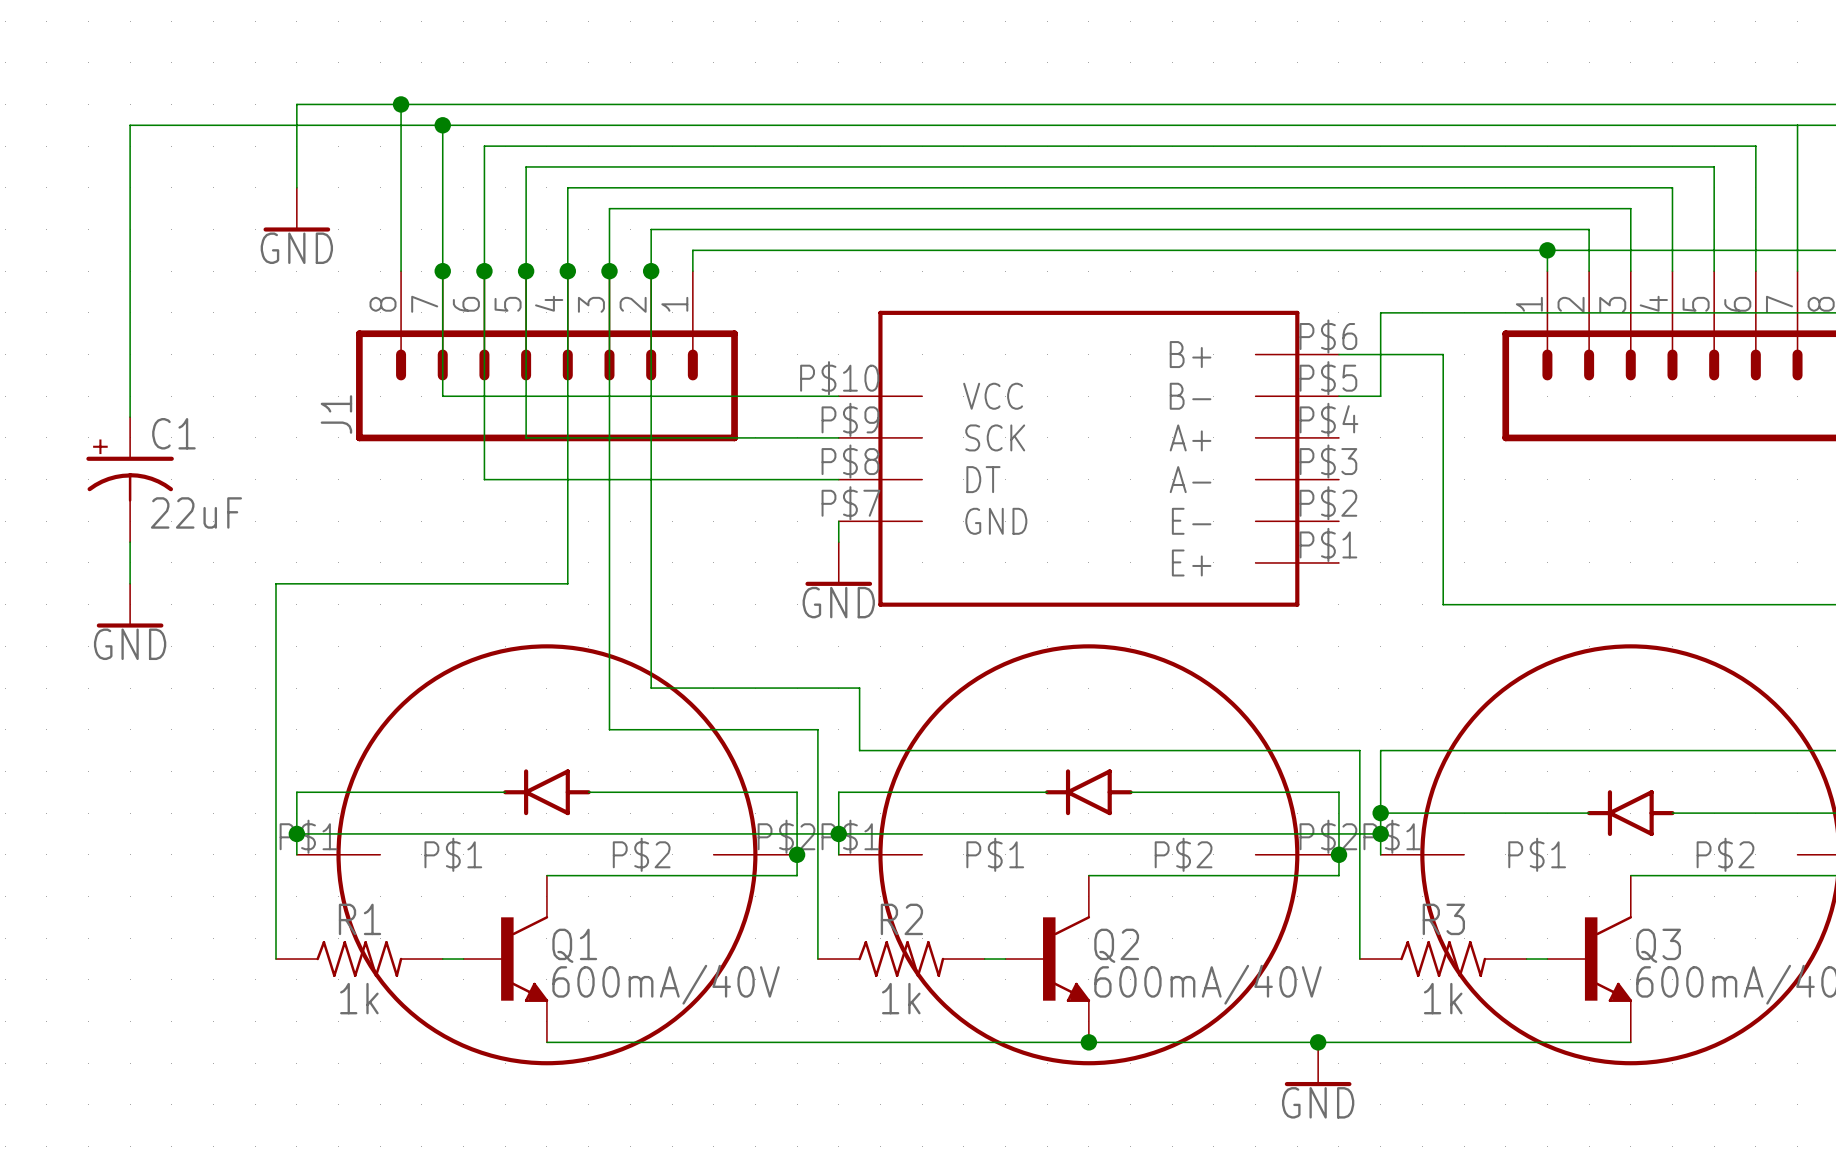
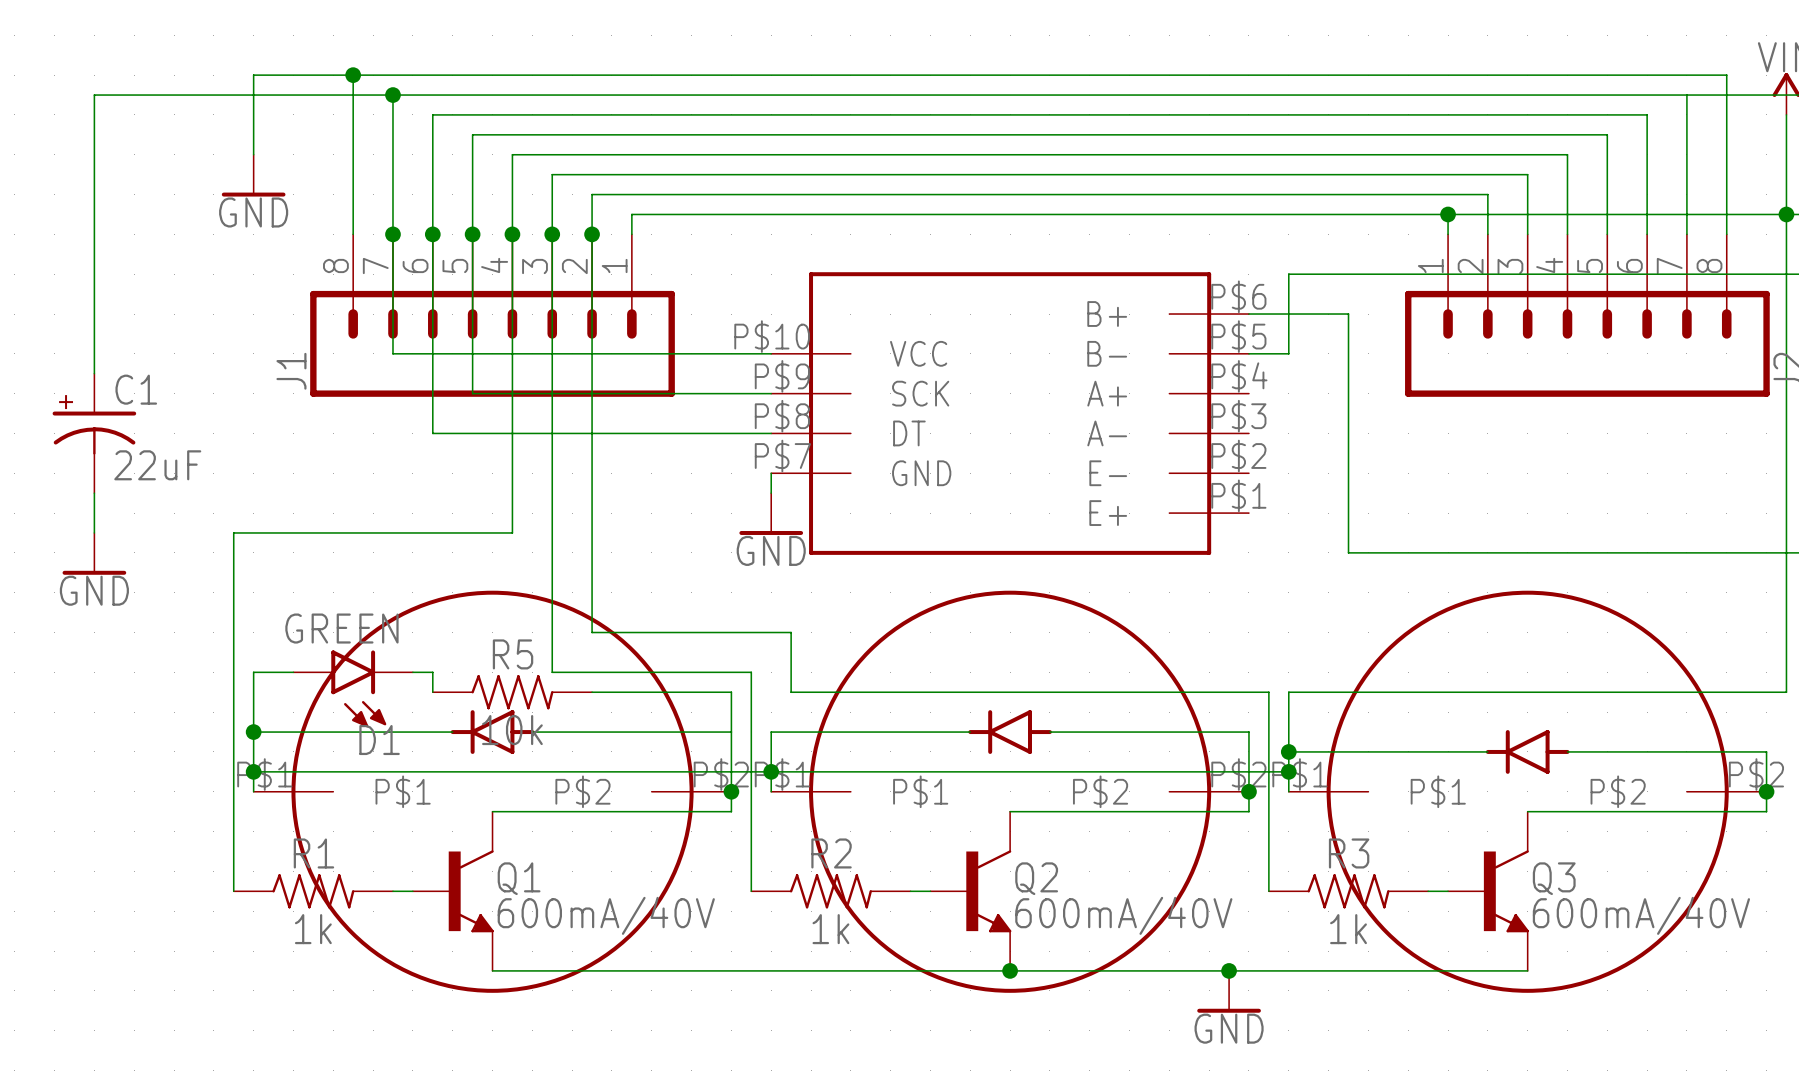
wire: none -> (293, 672) (253, 672) (253, 732)
wire: none -> (412, 672) (432, 672) (432, 692)
D1: none -> GREEN (353, 688)
R5: none -> 10k (512, 692)
wire: none -> (592, 692) (731, 692) (731, 732)
junction: none -> (253, 732)

